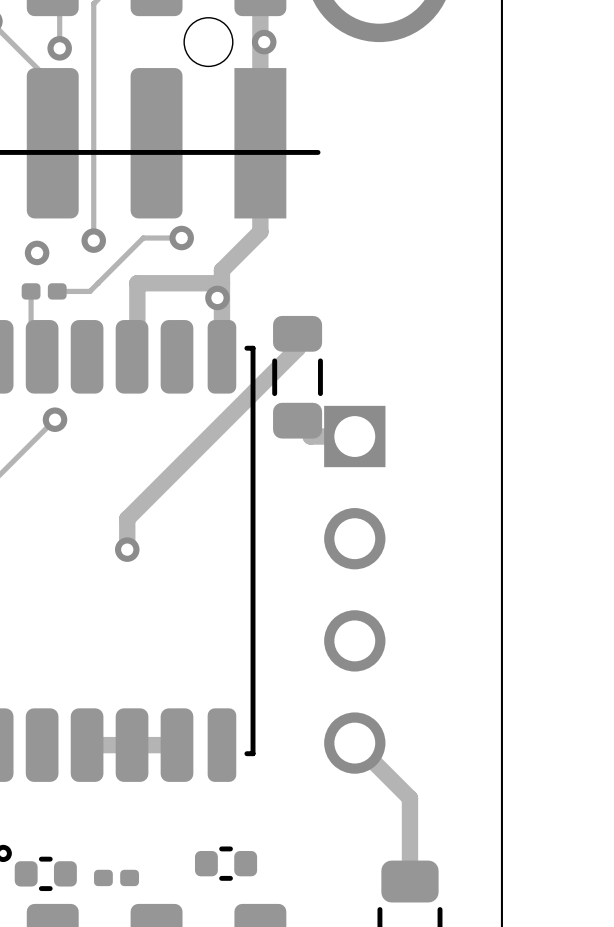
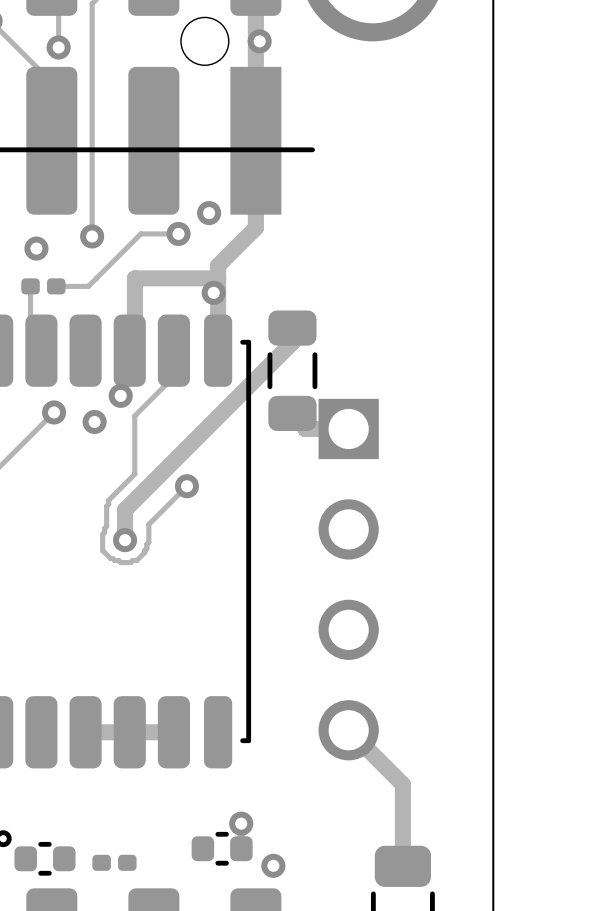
via: none -> (209, 213)
track: none -> (174, 351) (174, 375) (134, 415) (134, 474) (108, 500) (106, 506) (106, 526) (102, 534) (102, 550) (110, 558) (120, 562) (136, 560) (144, 552) (148, 542) (148, 524) (187, 486)
via: none -> (120, 395)
via: none -> (94, 421)
via: none -> (187, 486)
via: none -> (241, 823)
via: none -> (273, 865)

